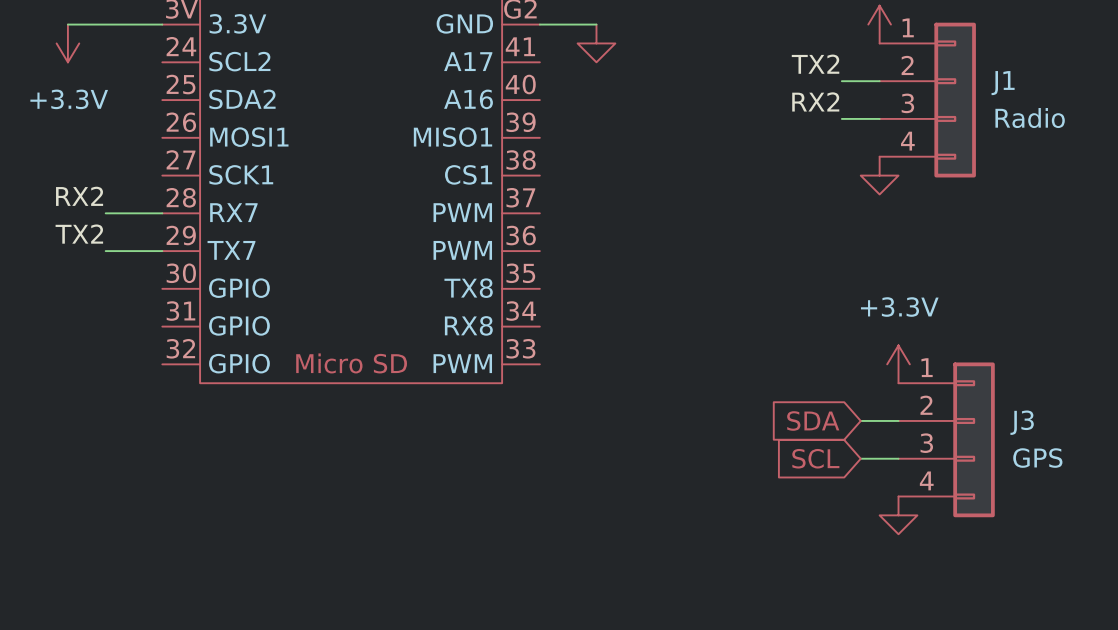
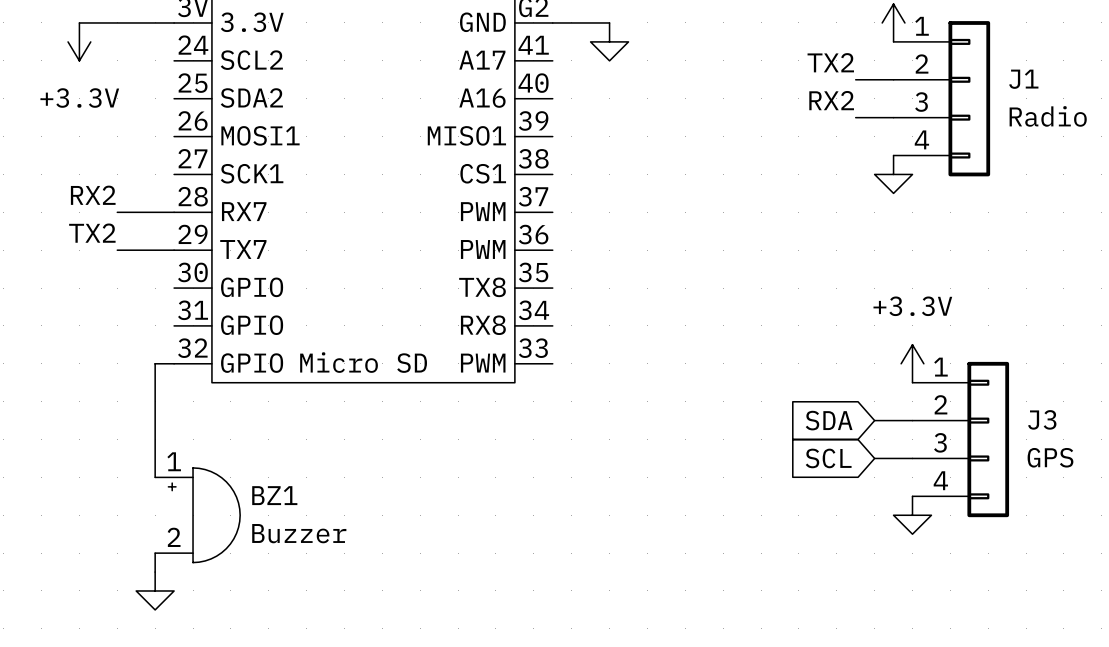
wire: none -> (174, 363) (155, 363) (155, 477)
BZ1: none -> Buzzer (197, 515)
wire: none -> (155, 553) (155, 572)
power symbol: none -> (155, 590)

